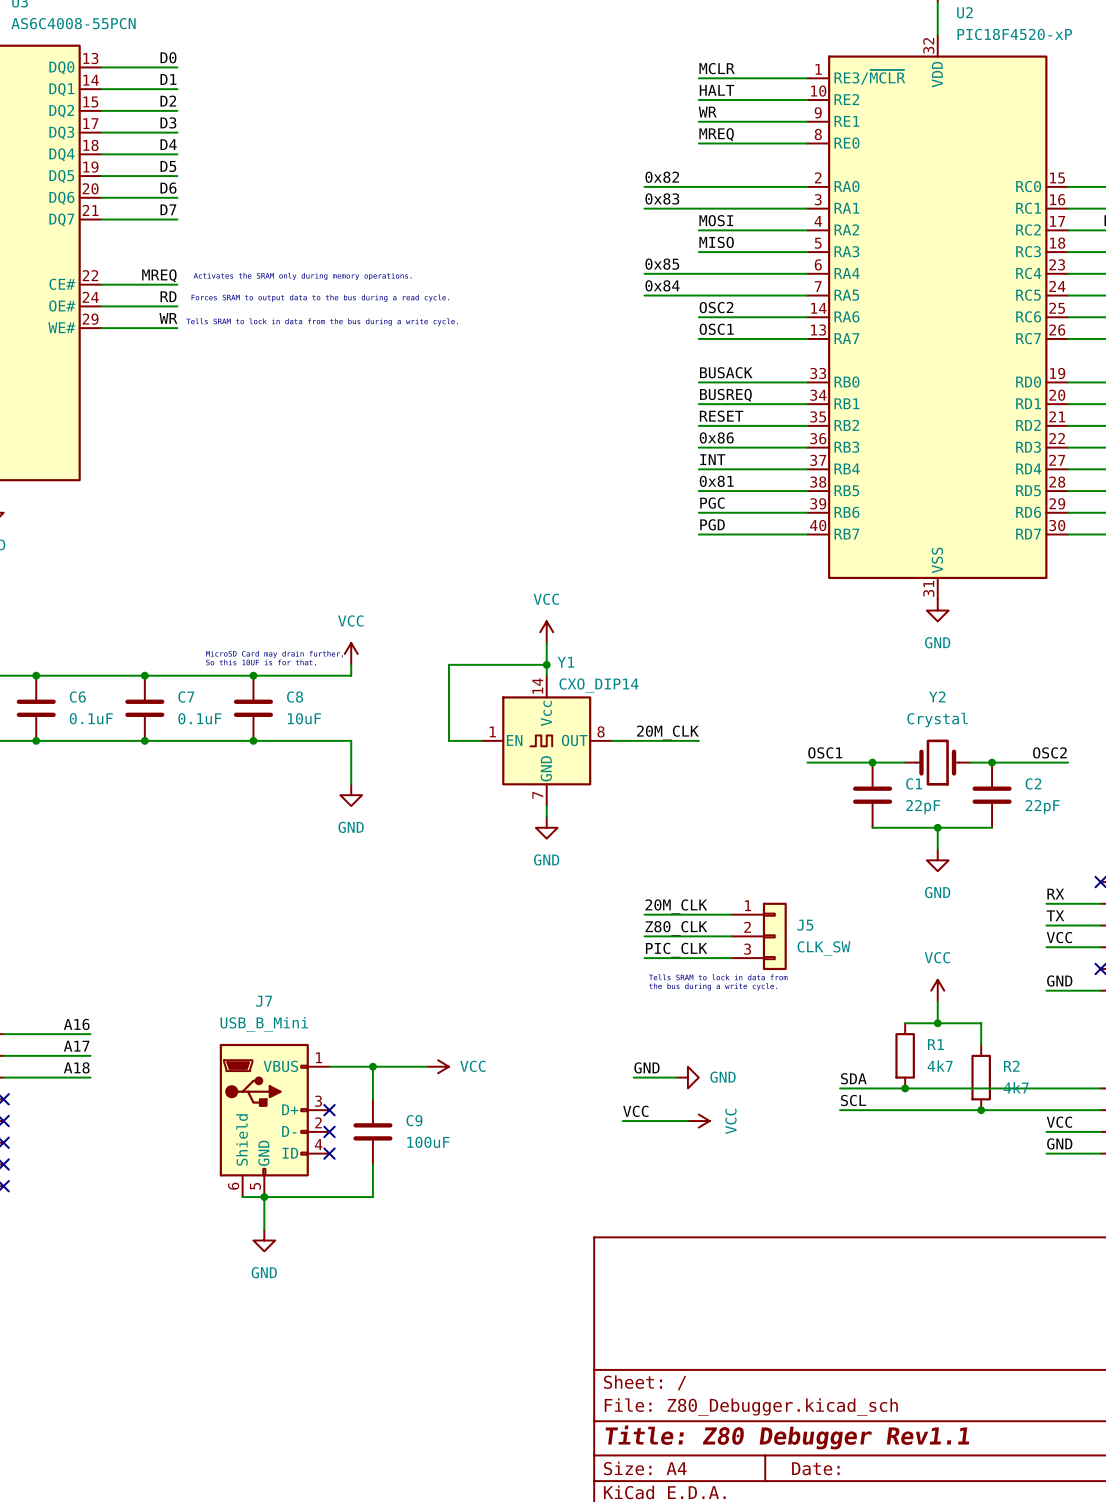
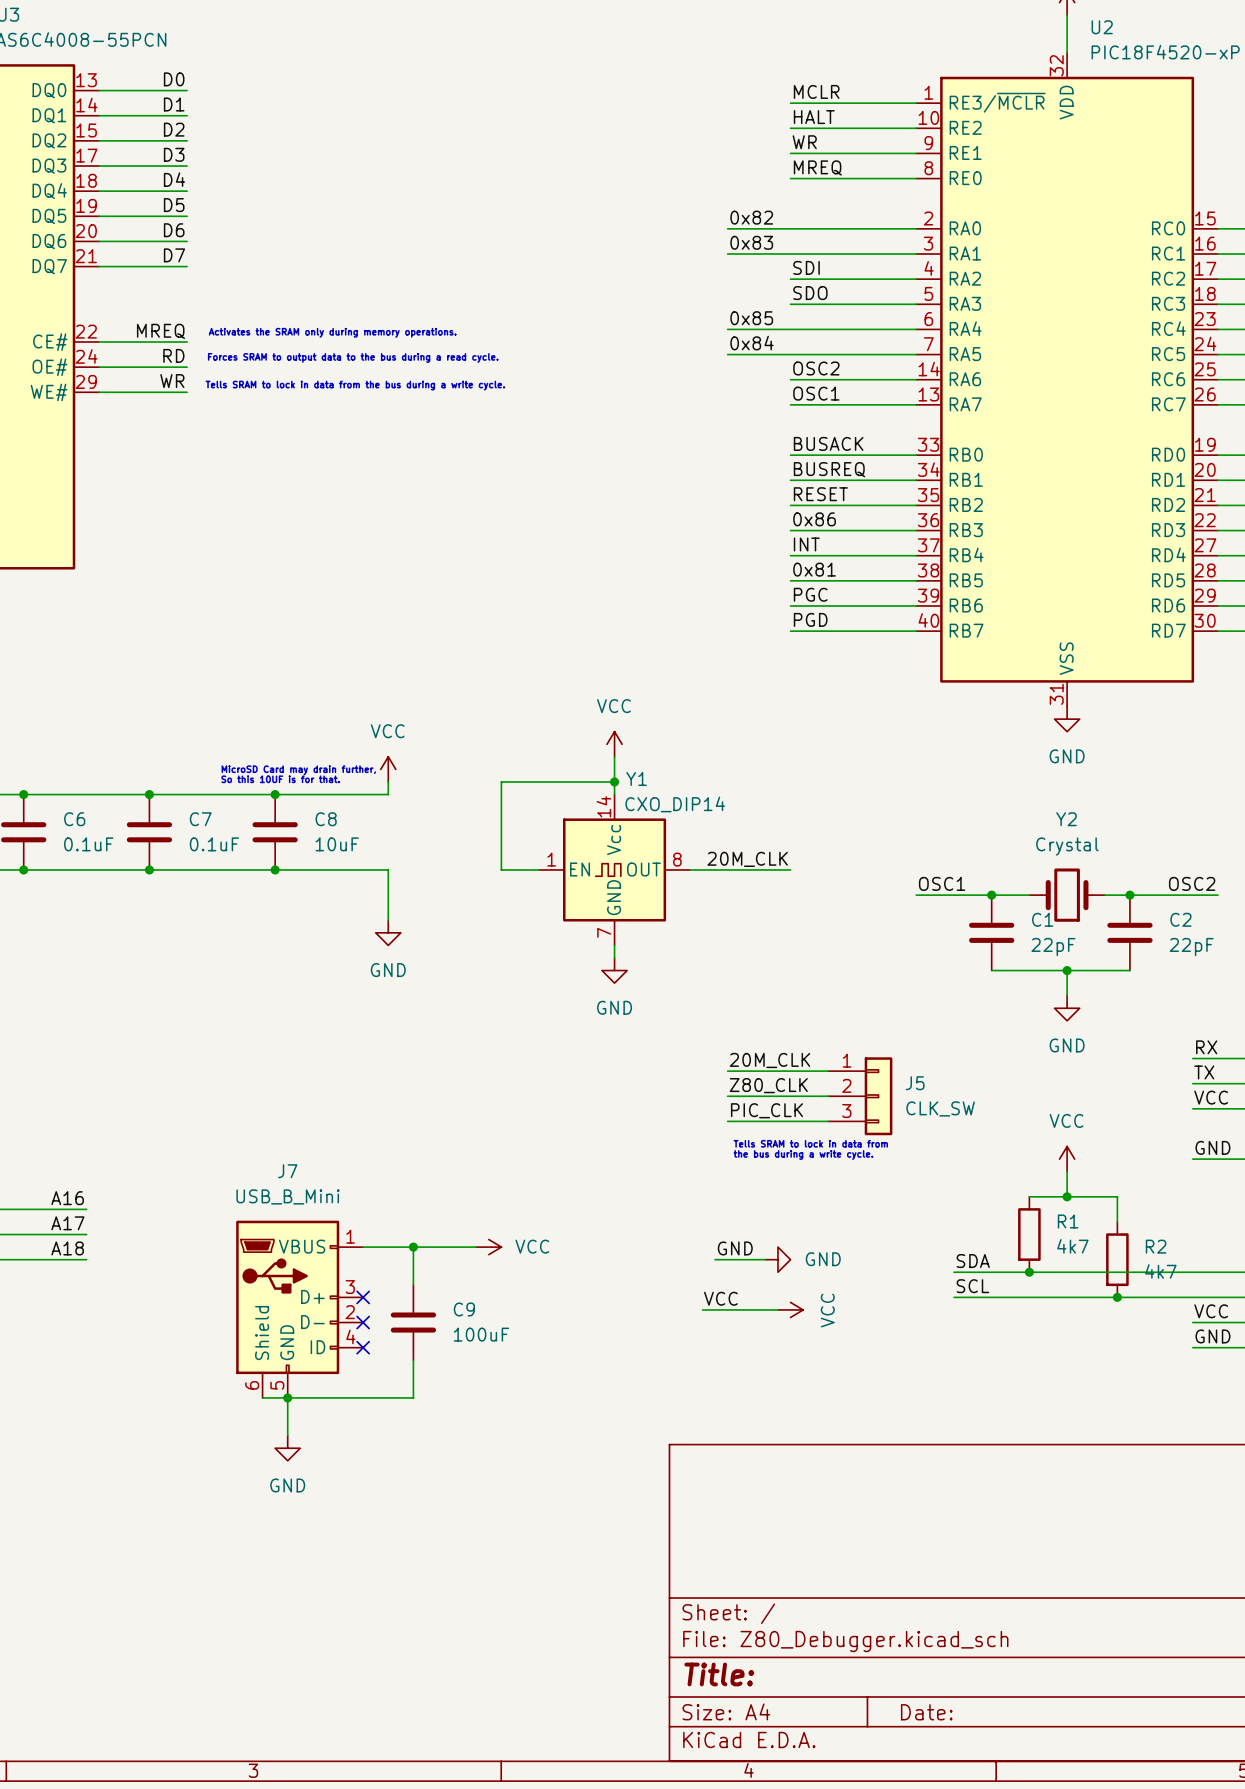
label: MOSI (716, 220) -> SDI (806, 267)
label: MISO (716, 242) -> SDO (810, 293)
title block: Title: Z80 Debugger Rev1.1 (787, 1437) -> Title: (719, 1674)

